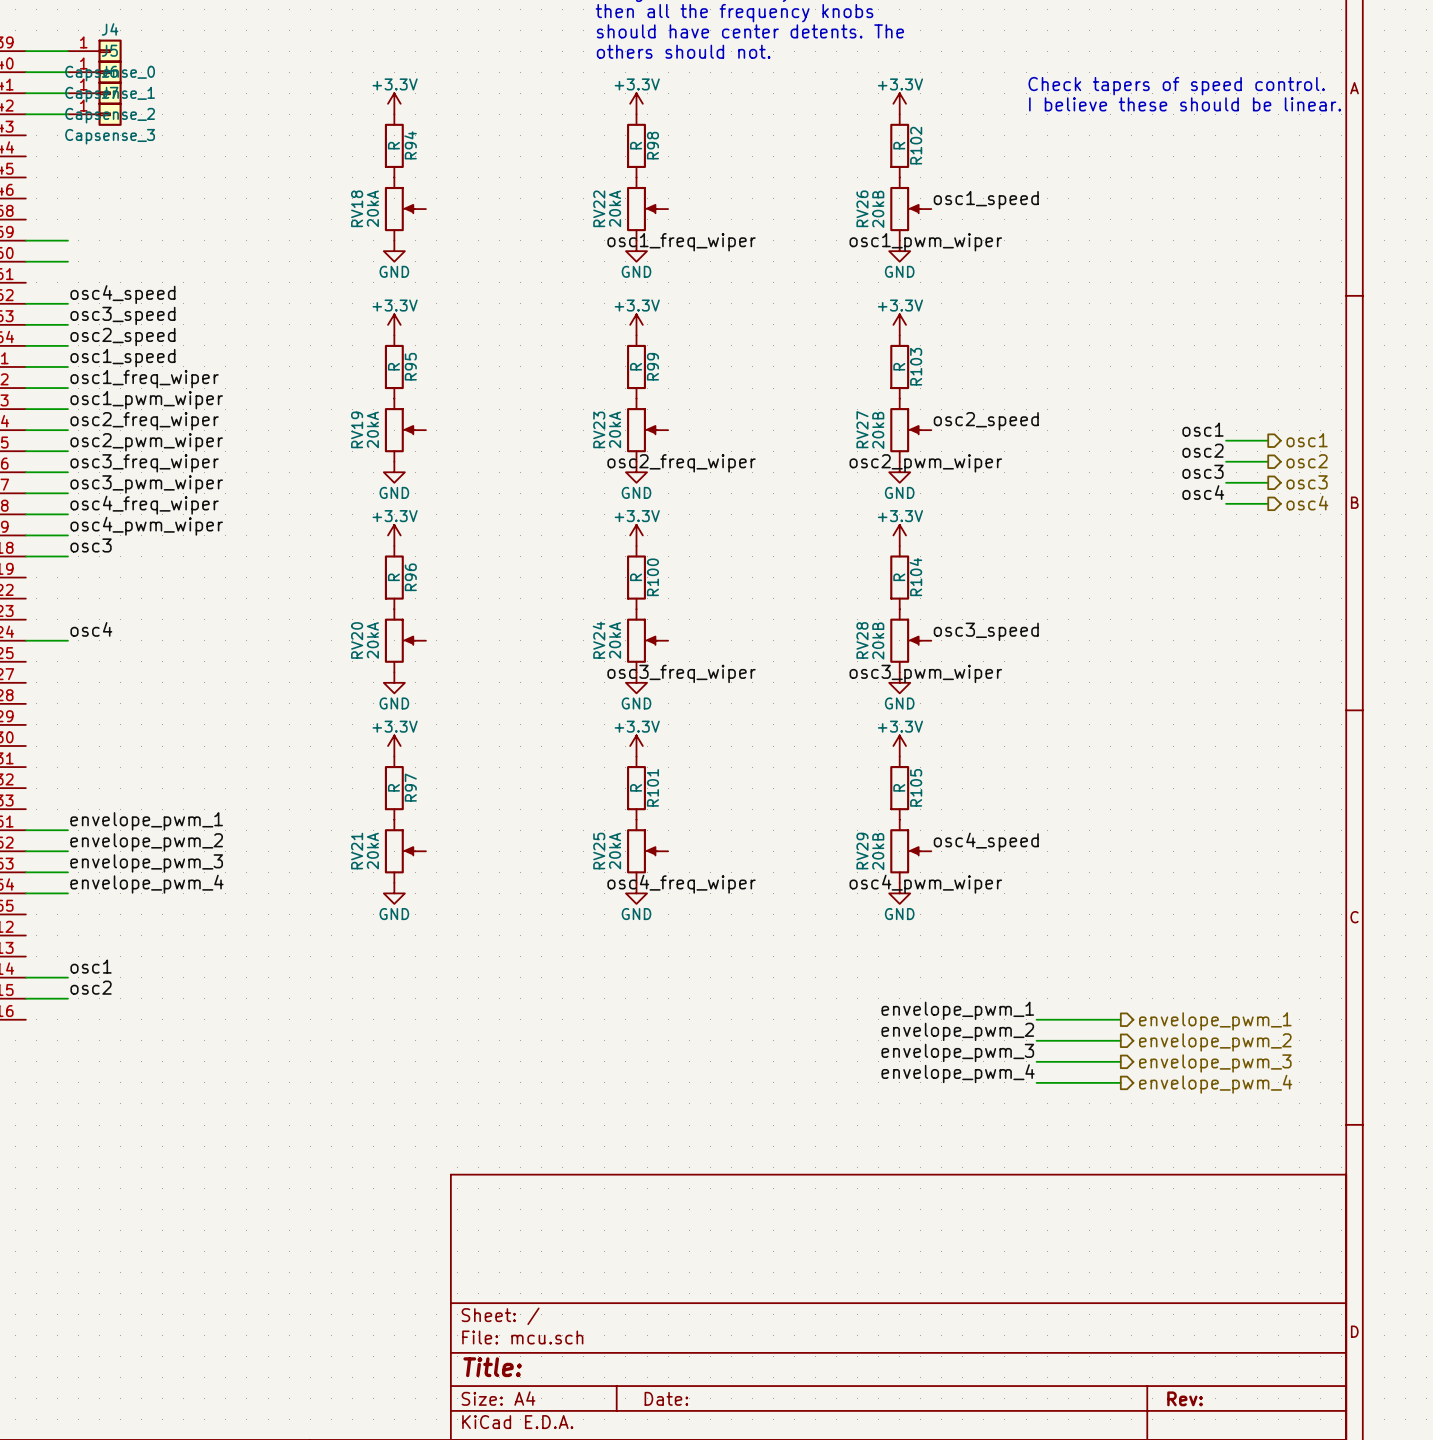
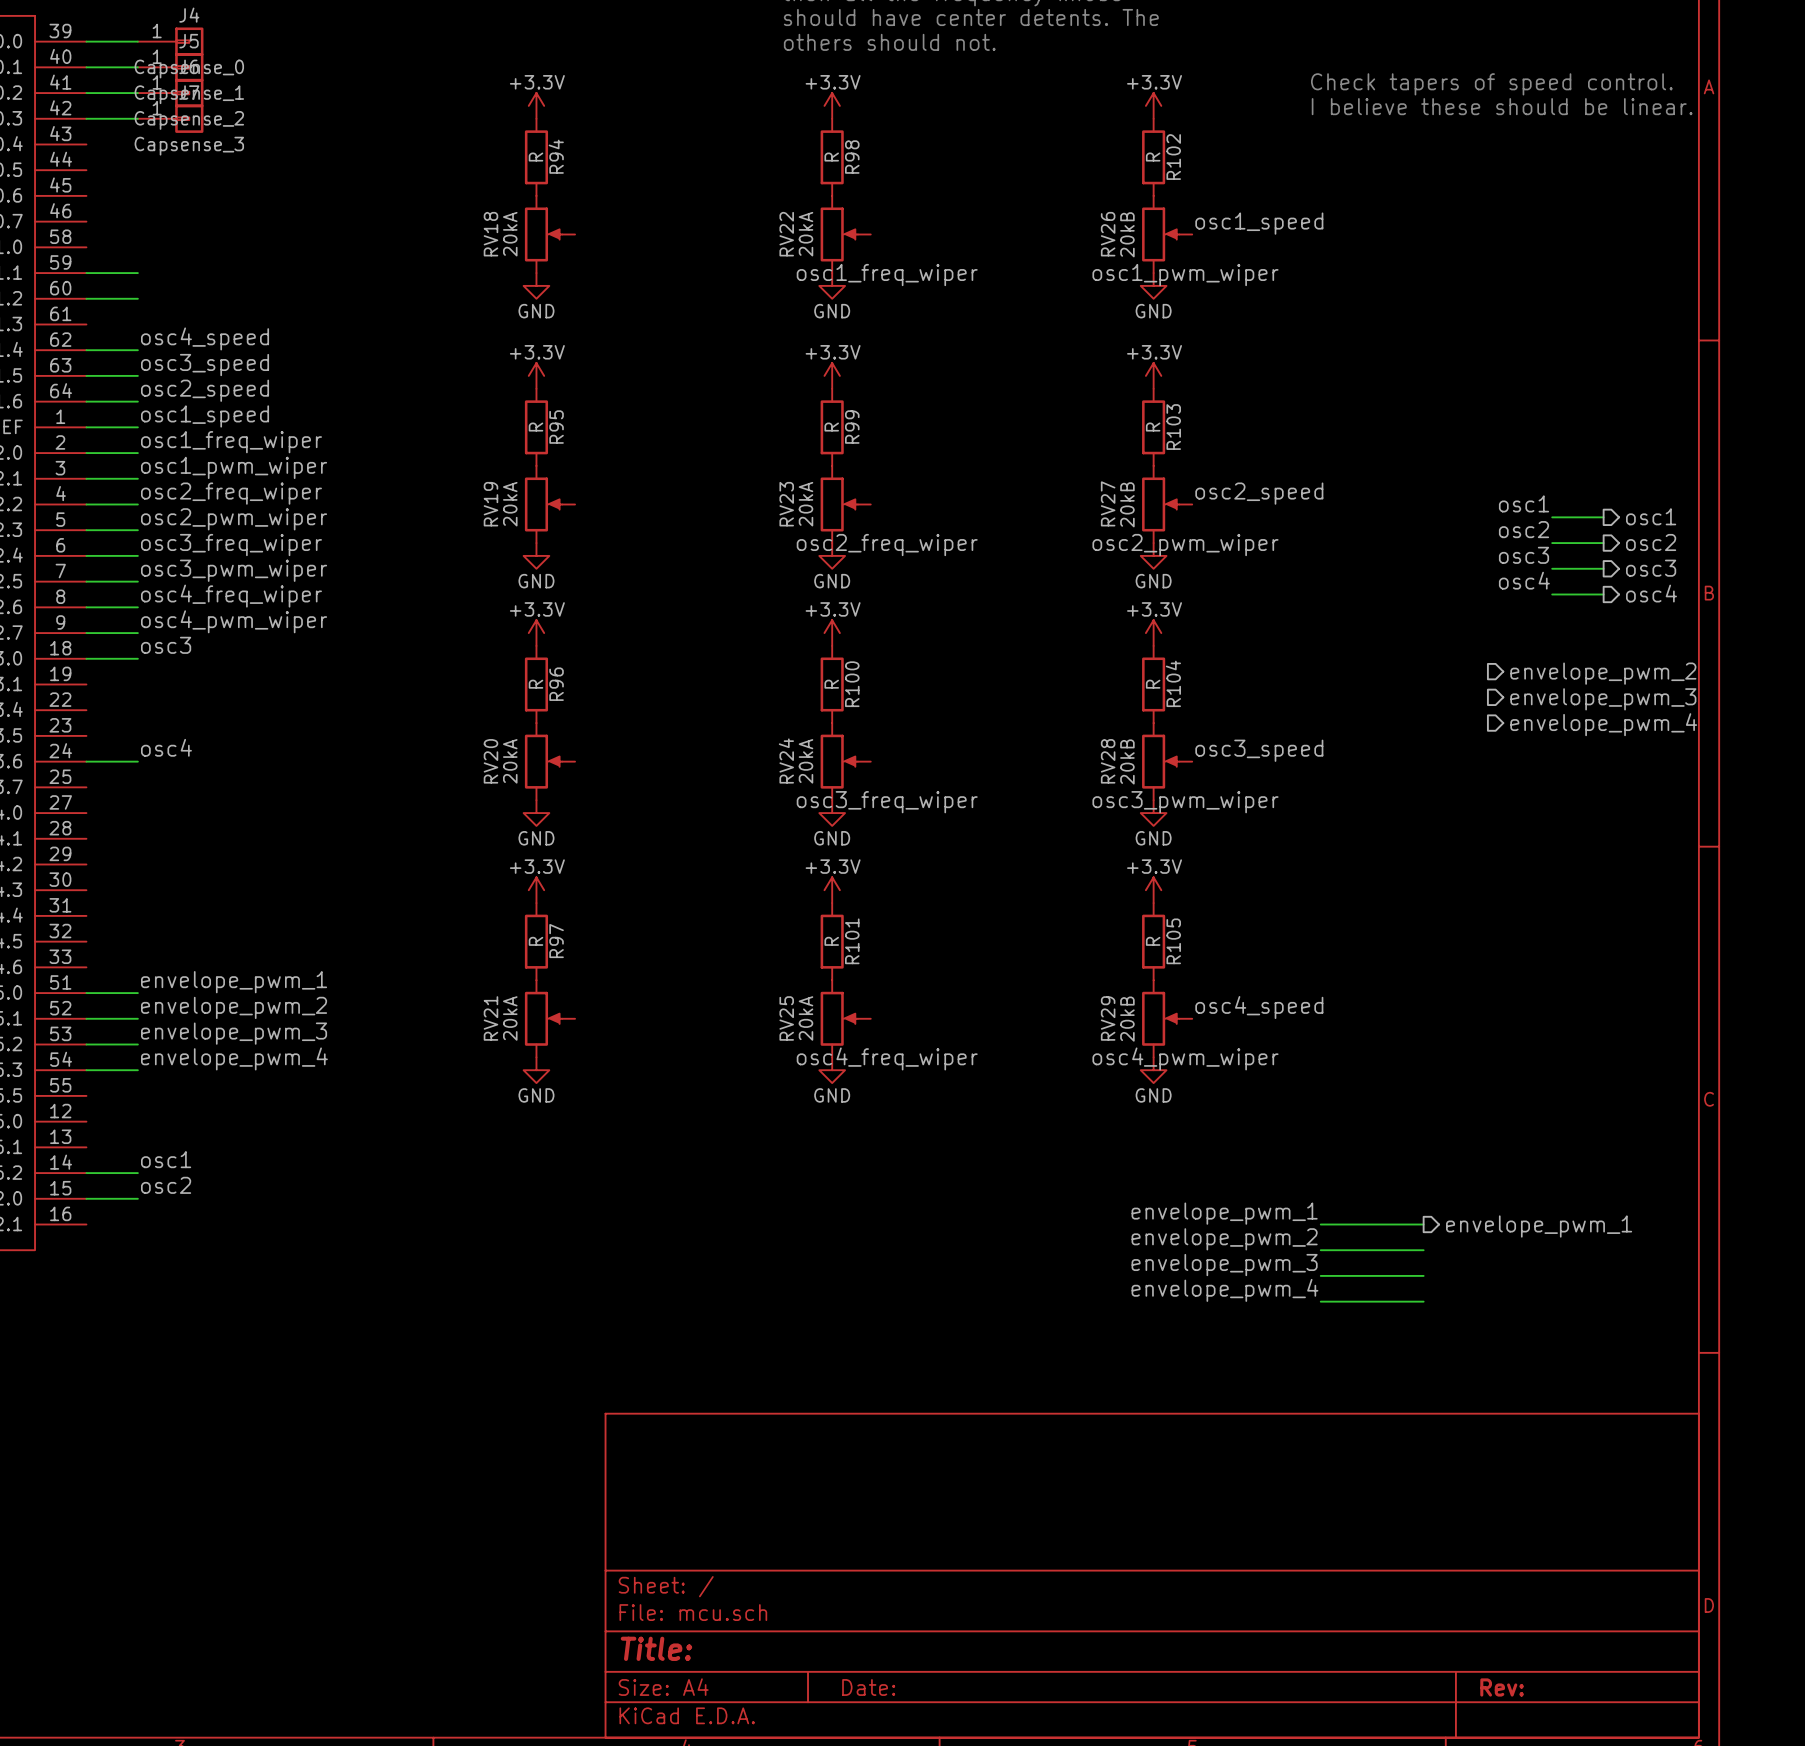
hierarchical label: none -> envelope_pwm_2 (1603, 673)
hierarchical label: none -> envelope_pwm_3 (1603, 699)
hierarchical label: none -> envelope_pwm_4 (1603, 724)
hierarchical label: envelope_pwm_2 (1215, 1042) -> none
hierarchical label: envelope_pwm_3 (1215, 1063) -> none
hierarchical label: envelope_pwm_4 (1215, 1084) -> none

